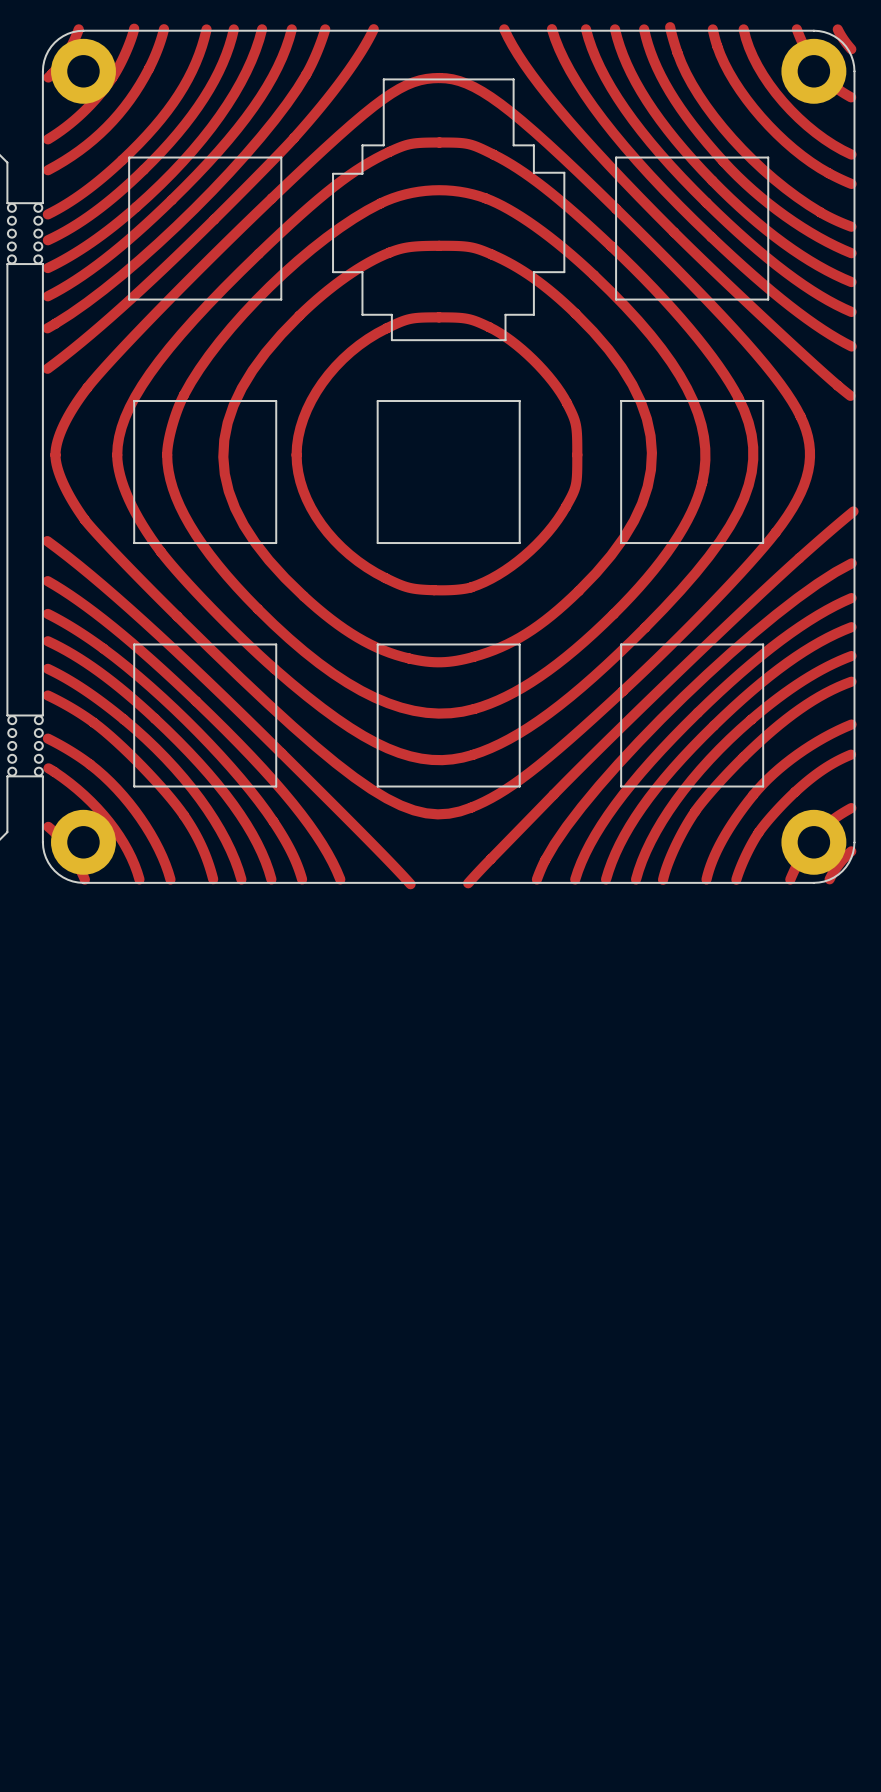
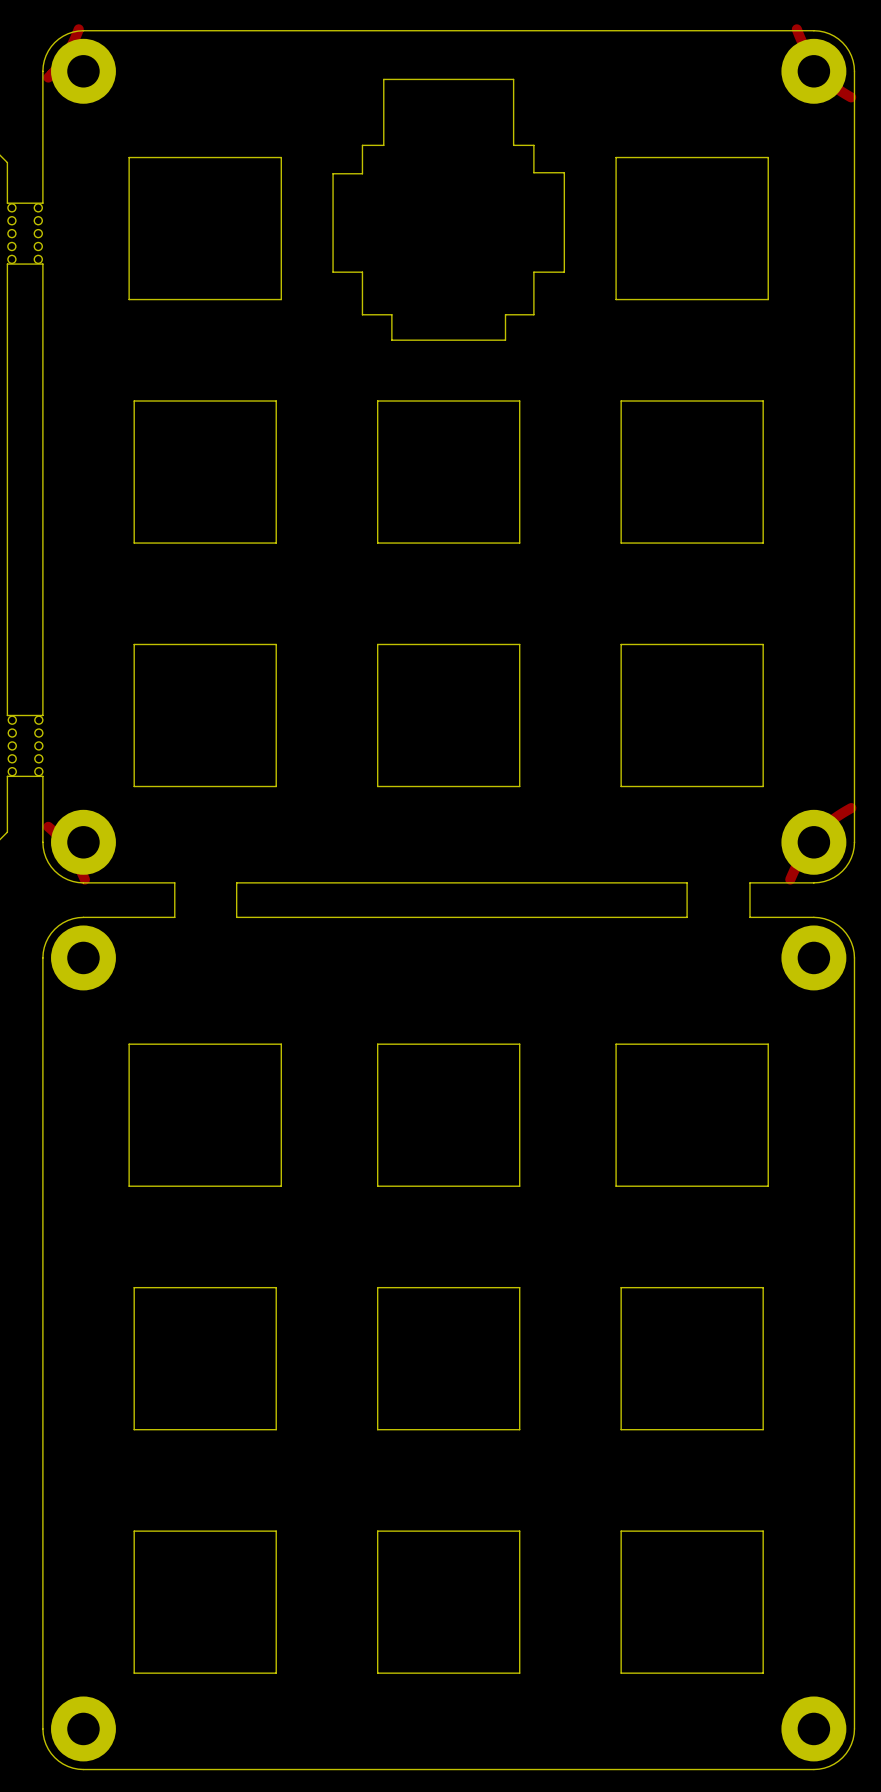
top track: (670, 27) (677, 53) (692, 84) (706, 106) (732, 138) (763, 169) (796, 197) (823, 214) (851, 226) -> none
top track: (134, 28) (122, 59) (105, 87) (78, 116) (47, 139) -> none
top track: (163, 29) (149, 68) (135, 92) (118, 114) (86, 145) (47, 170) -> none
top track: (206, 29) (199, 54) (188, 78) (173, 102) (154, 127) (131, 151) (98, 181) (70, 201) (47, 214) -> none
top track: (233, 29) (222, 63) (209, 89) (191, 115) (169, 142) (137, 175) (106, 202) (77, 224) (47, 240) -> none
top track: (262, 29) (251, 60) (234, 93) (211, 127) (182, 161) (148, 195) (113, 226) (80, 249) (47, 268) -> none
top track: (291, 29) (277, 67) (260, 97) (237, 128) (207, 163) (162, 208) (120, 246) (82, 275) (47, 296) -> none
top track: (325, 29) (312, 61) (297, 88) (274, 120) (229, 172) (176, 226) (139, 259) (86, 302) (47, 328) -> none
top track: (373, 29) (361, 51) (338, 84) (281, 151) (141, 289) (90, 334) (47, 368) -> none
top track: (504, 29) (518, 54) (539, 85) (608, 164) (712, 269) (805, 357) (850, 395) -> none
top track: (551, 29) (564, 59) (584, 94) (624, 146) (664, 190) (722, 247) (772, 291) (814, 324) (851, 346) -> none
top track: (586, 29) (600, 67) (617, 98) (641, 131) (682, 178) (727, 223) (776, 265) (811, 290) (851, 311) -> none
top track: (615, 29) (626, 64) (641, 91) (667, 129) (702, 170) (739, 206) (774, 236) (818, 265) (851, 282) -> none
top track: (644, 29) (653, 60) (669, 91) (692, 125) (723, 161) (752, 190) (785, 216) (818, 237) (851, 253) -> none
top track: (712, 29) (720, 54) (729, 72) (761, 117) (802, 155) (828, 173) (851, 183) -> none
top track: (743, 29) (757, 66) (783, 101) (815, 132) (851, 154) -> none
top track: (837, 29) (851, 49) -> none
top track: (439, 78) (420, 80) (406, 85) (373, 106) (324, 148) (227, 241) (133, 336) (87, 387) (63, 425) (57, 441) (55, 454) (57, 467) (65, 487) (88, 524) (161, 600) (267, 703) (335, 763) (371, 789) (400, 805) (413, 810) (437, 814) (449, 813) (471, 807) (513, 784) (569, 739) (645, 669) (722, 592) (775, 532) (800, 492) (808, 471) (809, 457) (806, 430) (786, 393) (745, 341) (691, 284) (579, 173) (510, 111) (474, 87) (459, 81) (439, 78) -> none
top track: (439, 142) (471, 144) (511, 164) (558, 199) (622, 257) (672, 308) (718, 365) (744, 410) (753, 447) (751, 472) (748, 485) (729, 526) (695, 573) (645, 627) (582, 686) (528, 727) (481, 751) (462, 757) (442, 760) (421, 758) (399, 752) (363, 735) (307, 696) (251, 648) (188, 584) (151, 538) (126, 493) (118, 470) (117, 454) (119, 436) (125, 417) (150, 373) (194, 319) (258, 253) (318, 199) (362, 166) (403, 145) (439, 142) -> none
top track: (485, 198) (521, 217) (563, 248) (610, 290) (650, 334) (679, 375) (693, 400) (703, 436) (704, 471) (700, 489) (691, 512) (667, 552) (631, 596) (584, 641) (539, 676) (498, 700) (462, 711) (426, 712) (388, 703) (347, 682) (304, 651) (257, 609) (218, 565) (189, 524) (172, 488) (168, 471) (167, 448) (172, 425) (180, 401) (209, 355) (256, 300) (311, 249) (353, 218) (380, 203) (399, 196) (418, 191) (446, 190) (466, 192) (485, 198) -> none
top track: (439, 245) (404, 247) (374, 259) (334, 285) (299, 315) (265, 352) (241, 388) (227, 422) (223, 457) (228, 491) (243, 525) (268, 560) (303, 596) (337, 624) (370, 644) (402, 656) (437, 662) (469, 658) (507, 644) (538, 625) (578, 590) (611, 555) (634, 520) (647, 486) (651, 452) (646, 418) (632, 384) (608, 349) (575, 313) (538, 281) (502, 259) (472, 247) (439, 245) -> none
top track: (439, 317) (412, 318) (397, 323) (368, 338) (342, 359) (322, 383) (307, 409) (298, 436) (296, 454) (300, 481) (310, 507) (327, 532) (349, 554) (375, 573) (403, 586) (419, 589) (448, 590) (471, 587) (498, 574) (524, 555) (547, 532) (562, 513) (575, 487) (577, 436) (573, 417) (560, 392) (543, 370) (522, 349) (499, 333) (477, 321) (462, 318) (439, 317) -> none
top track: (853, 511) (776, 579) (659, 690) (564, 783) (468, 883) -> none
top track: (47, 541) (103, 585) (190, 664) (320, 792) (410, 884) -> none
top track: (851, 563) (817, 583) (775, 614) (730, 653) (660, 719) (618, 764) (581, 806) (554, 844) (536, 879) -> none
top track: (47, 581) (86, 606) (131, 642) (184, 690) (238, 743) (301, 814) (322, 844) (340, 879) -> none
top track: (851, 598) (808, 620) (771, 647) (730, 681) (685, 725) (641, 772) (608, 815) (590, 844) (575, 879) -> none
top track: (47, 613) (85, 635) (126, 666) (162, 697) (209, 743) (250, 790) (273, 821) (291, 852) (302, 879) -> none
top track: (851, 627) (811, 646) (778, 669) (733, 707) (692, 747) (656, 788) (635, 817) (619, 844) (606, 879) -> none
top track: (47, 641) (79, 658) (112, 681) (147, 711) (189, 752) (217, 784) (240, 814) (257, 843) (271, 879) -> none
top track: (851, 656) (821, 669) (790, 689) (751, 719) (719, 749) (691, 780) (662, 821) (646, 851) (636, 879) -> none
top track: (47, 668) (79, 686) (113, 711) (145, 738) (175, 768) (200, 799) (220, 830) (234, 860) (241, 879) -> none
top track: (851, 681) (819, 696) (793, 714) (765, 736) (729, 771) (703, 800) (689, 819) (673, 851) (663, 879) -> none
top track: (47, 695) (74, 709) (99, 726) (129, 753) (160, 786) (180, 810) (193, 830) (204, 853) (213, 879) -> none
top track: (851, 724) (804, 749) (762, 784) (744, 806) (725, 834) (712, 860) (706, 879) -> none
top track: (47, 738) (90, 764) (123, 796) (154, 841) (170, 879) -> none
top track: (851, 754) (815, 774) (776, 810) (753, 840) (736, 879) -> none
top track: (48, 768) (84, 795) (109, 821) (127, 850) (139, 879) -> none
top track: (851, 851) (839, 864) (829, 879) -> none
board edge: (236, 882) (174, 882) -> (236, 882) (236, 917) (687, 917) (687, 882)
board edge: (749, 882) (687, 882) -> (749, 882) (749, 917) (824, 918) (842, 929) (849, 937) (854, 952) (854, 1728) (851, 1744) (846, 1753) (834, 1764) (813, 1769) (78, 1769) (63, 1764) (51, 1753) (44, 1739) (42, 1728) (43, 952) (51, 933) (58, 925) (72, 918) (174, 917) (174, 882)
part: none -> (83, 957)
part: none -> (813, 957)
board edge: none -> (281, 1044) (281, 1186) (129, 1186) (129, 1044) (281, 1044)
board edge: none -> (519, 1044) (519, 1186) (377, 1186) (377, 1044) (519, 1044)
board edge: none -> (768, 1044) (768, 1186) (616, 1186) (616, 1044) (768, 1044)
board edge: none -> (276, 1287) (276, 1429) (134, 1429) (134, 1287) (276, 1287)
board edge: none -> (519, 1287) (519, 1429) (377, 1429) (377, 1287) (519, 1287)
board edge: none -> (763, 1287) (763, 1429) (621, 1429) (621, 1287) (763, 1287)
board edge: none -> (276, 1531) (276, 1673) (134, 1673) (134, 1531) (276, 1531)
board edge: none -> (519, 1531) (519, 1673) (377, 1673) (377, 1531) (519, 1531)
board edge: none -> (763, 1531) (763, 1673) (621, 1673) (621, 1531) (763, 1531)
part: none -> (83, 1728)
part: none -> (813, 1728)

